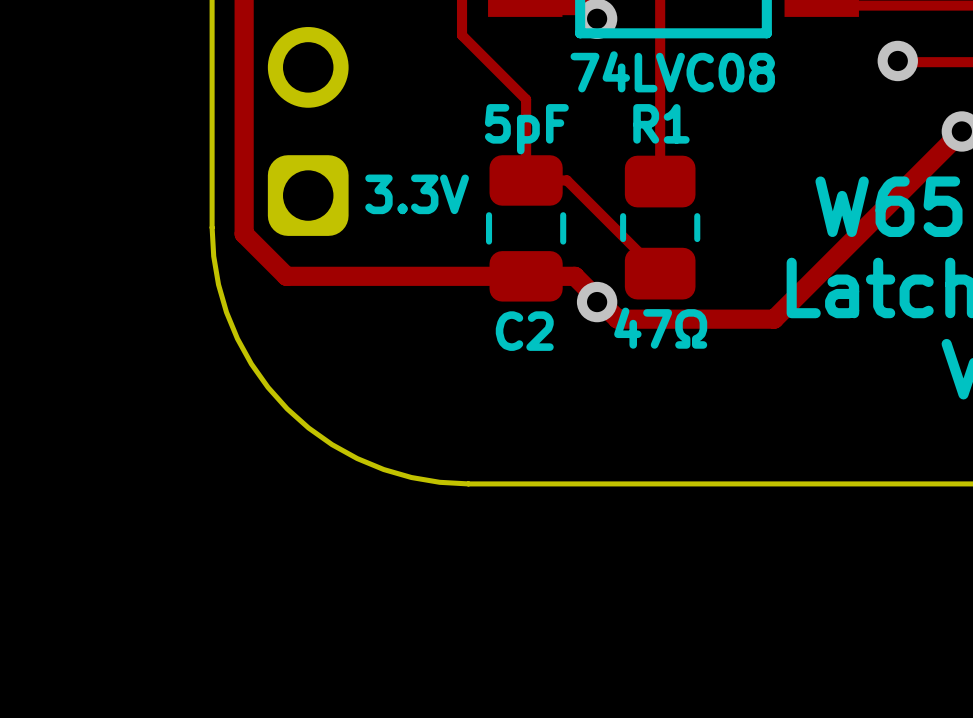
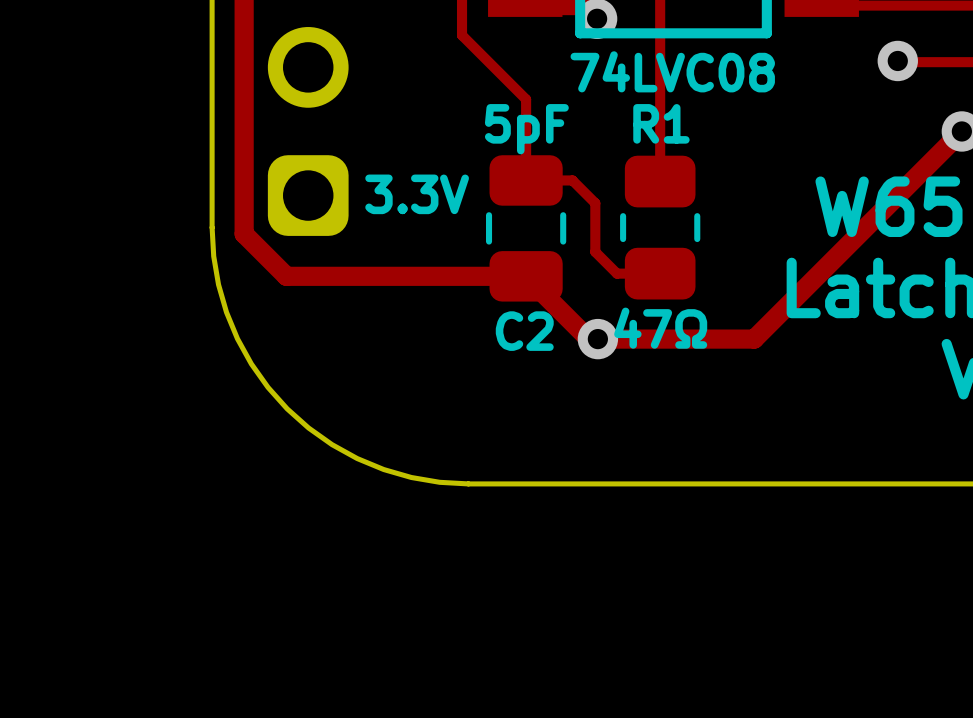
track: (567, 180) (660, 273) -> (567, 180) (572, 180) (595, 203) (595, 251) (617, 273) (660, 273)
track: (526, 276) (574, 276) (617, 319) (774, 319) -> (526, 276) (588, 339) (754, 339) (774, 319)
via position: (597, 302) -> (597, 339)

